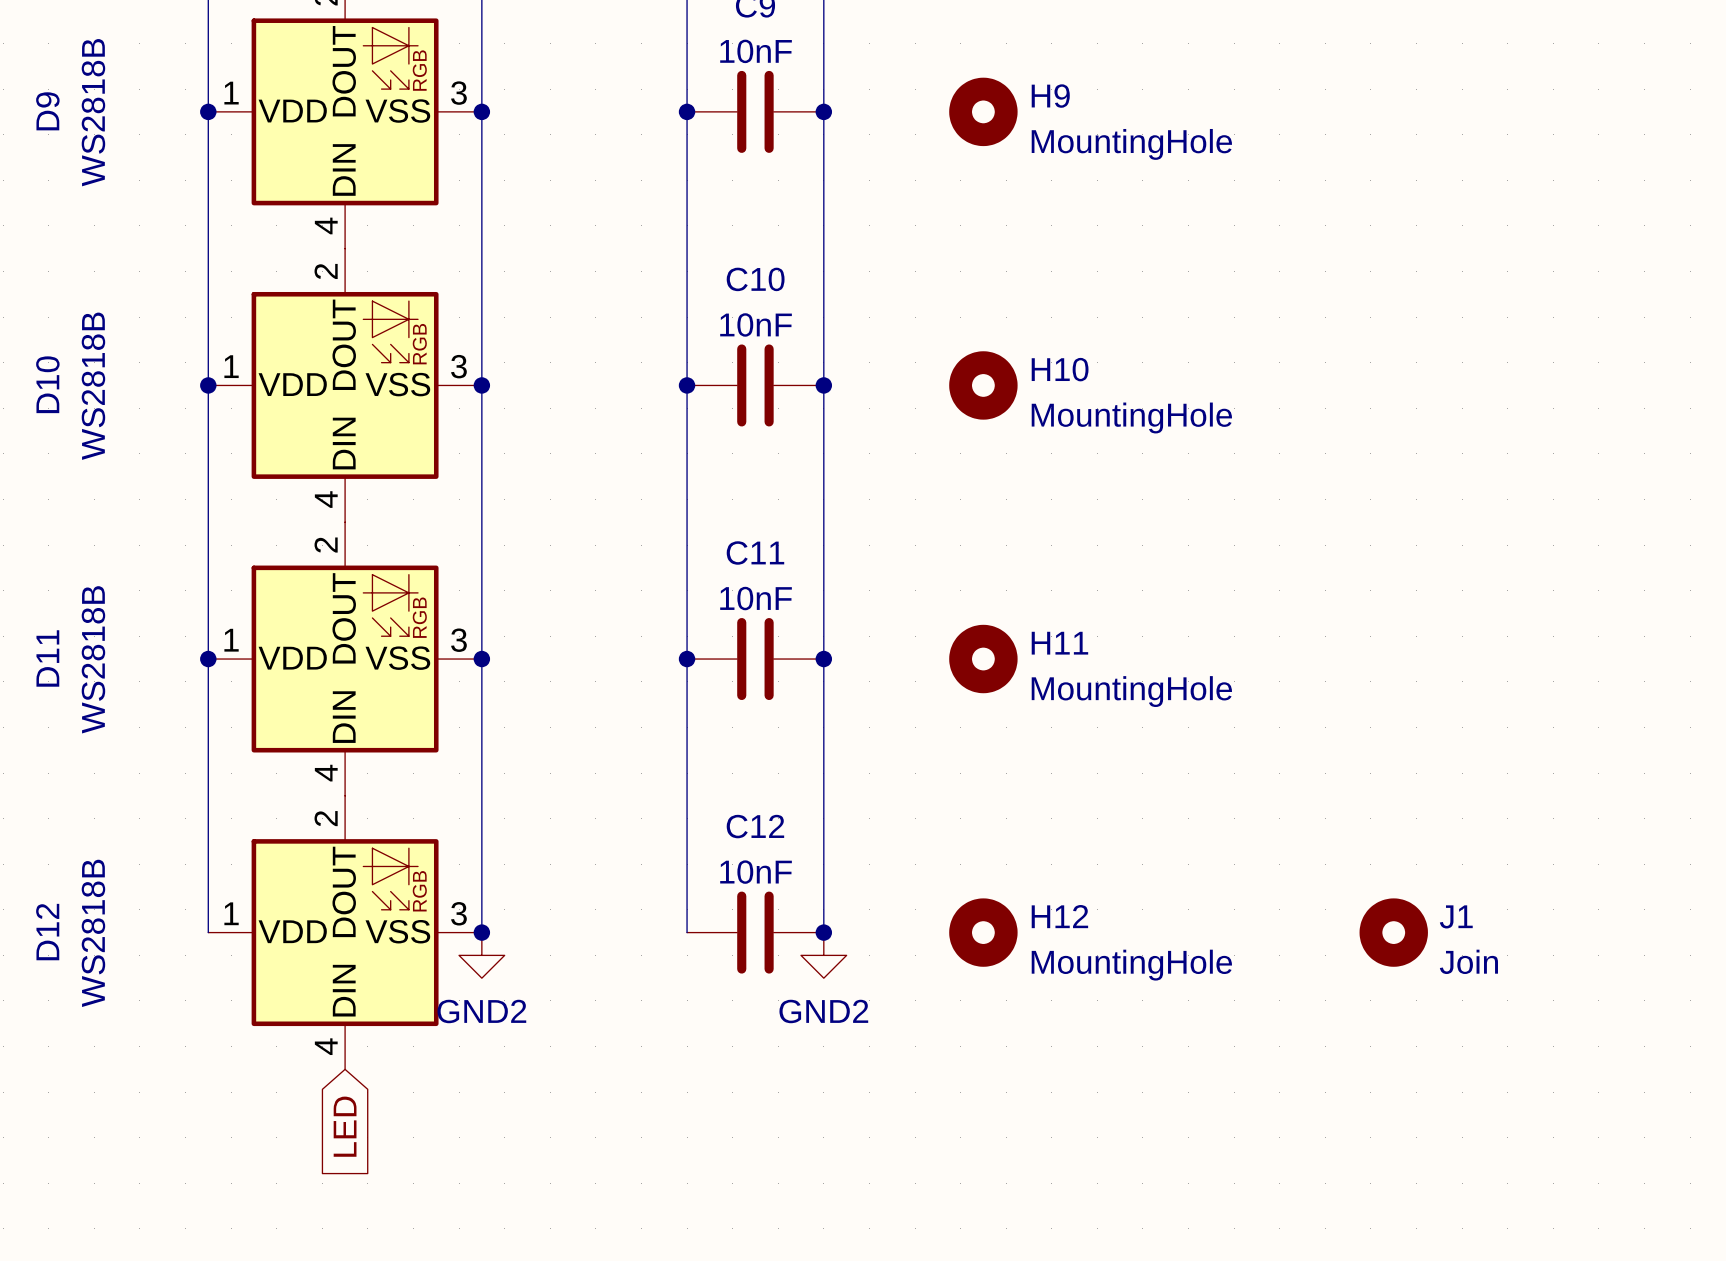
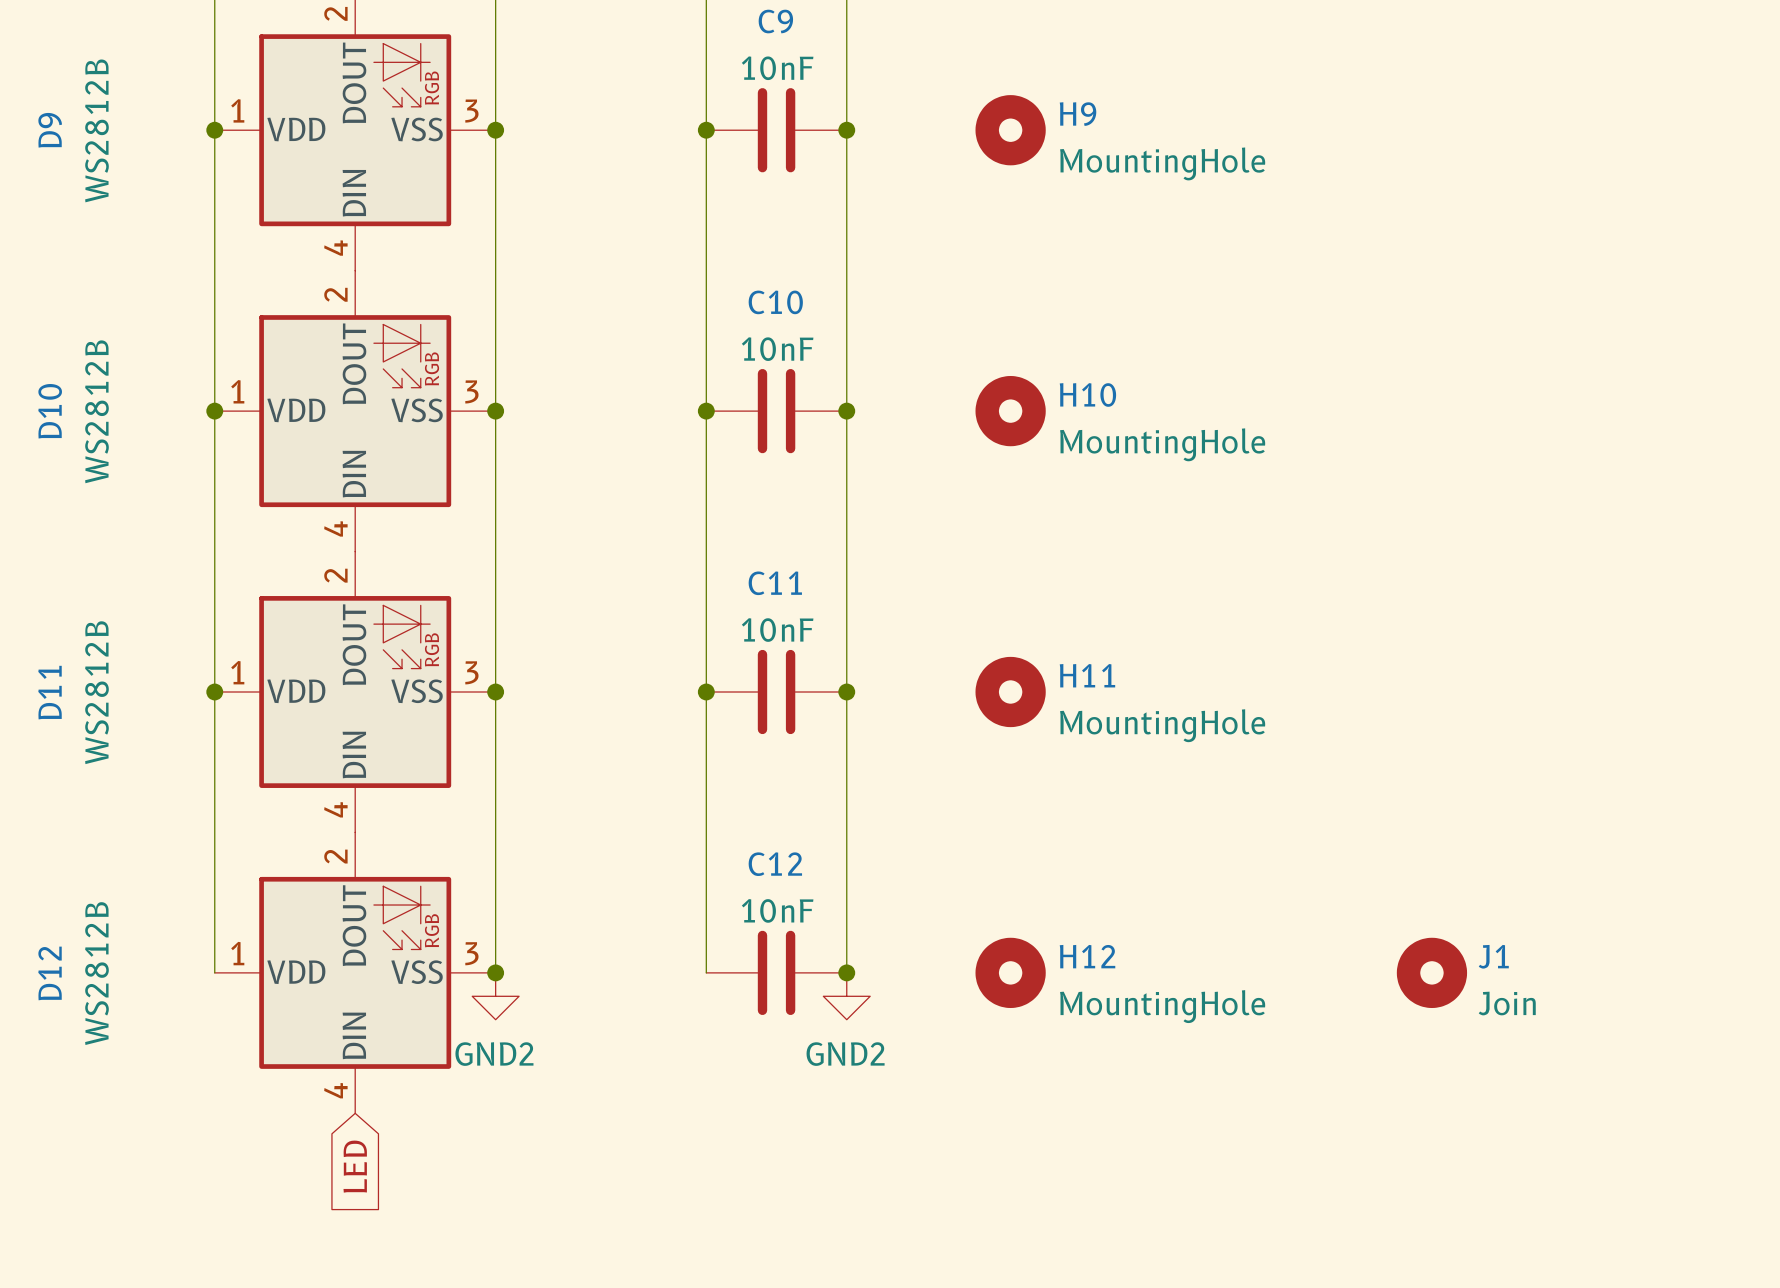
D9 value: WS2818B (93, 112) -> WS2812B (96, 130)
D10 value: WS2818B (93, 386) -> WS2812B (96, 411)
D11 value: WS2818B (93, 659) -> WS2812B (96, 692)
D12 value: WS2818B (93, 933) -> WS2812B (96, 973)

